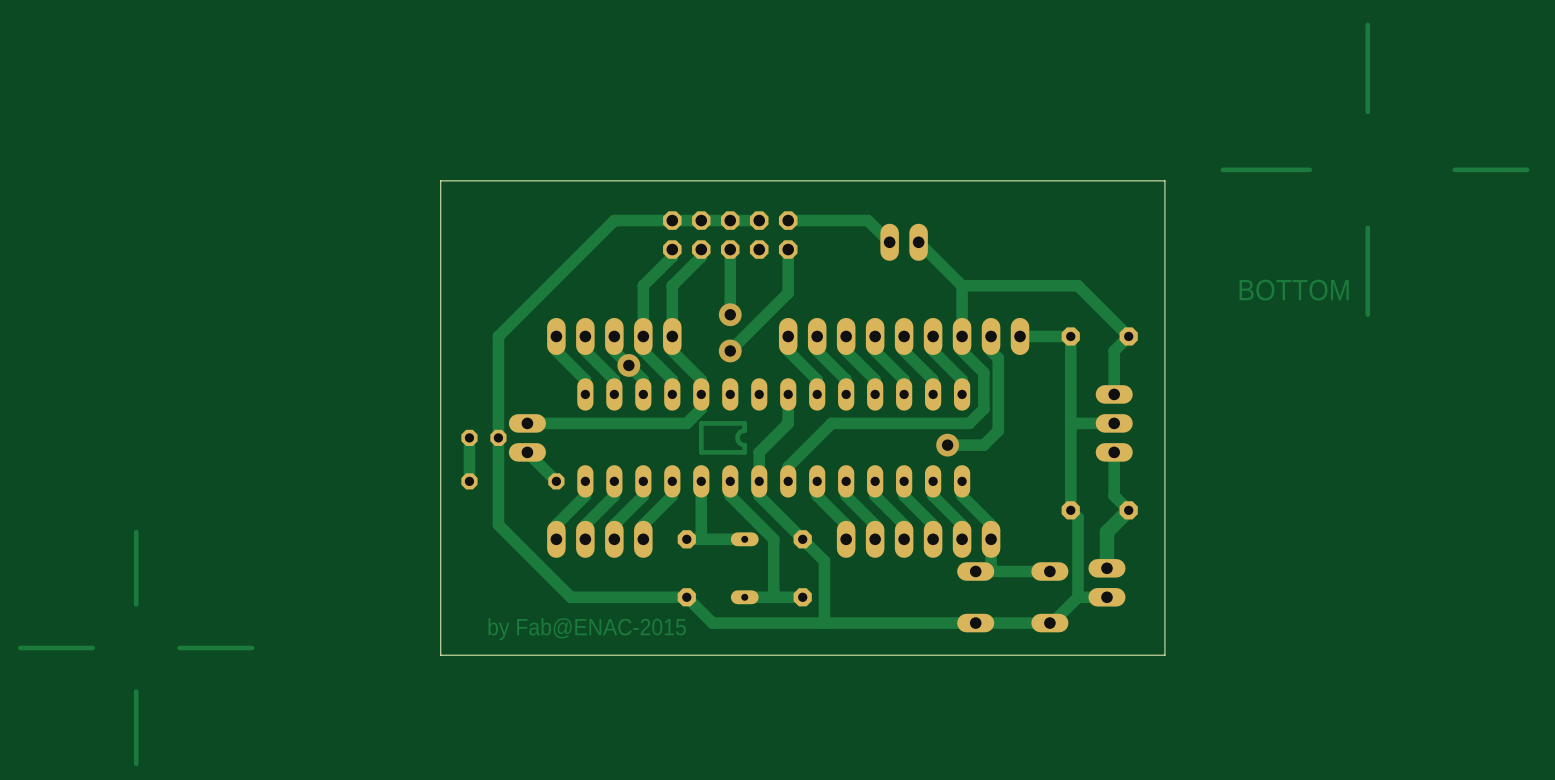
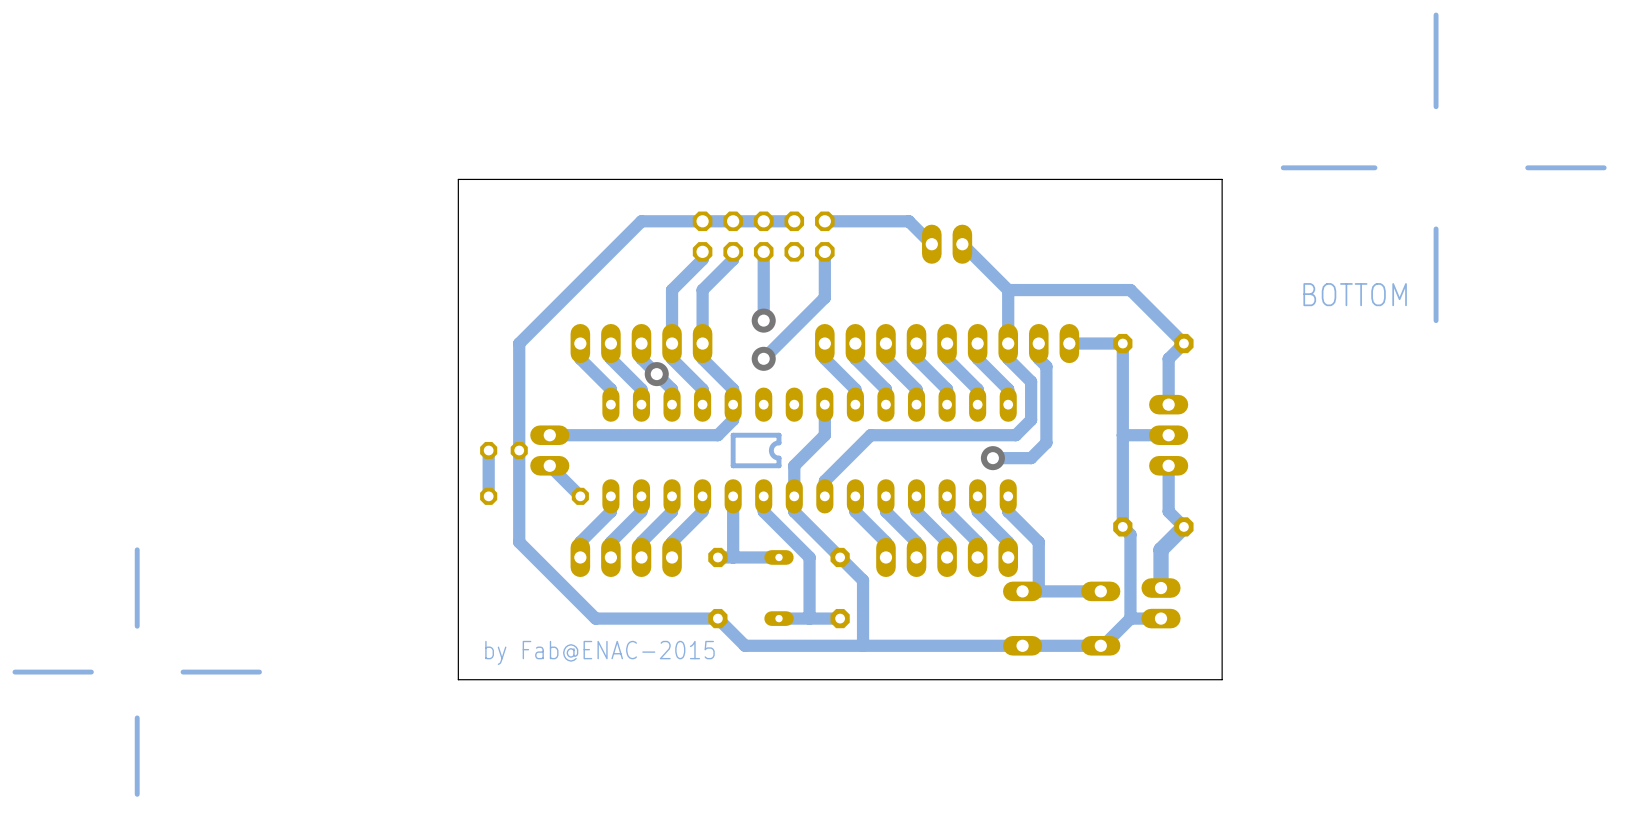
part: (918, 539) -> none

